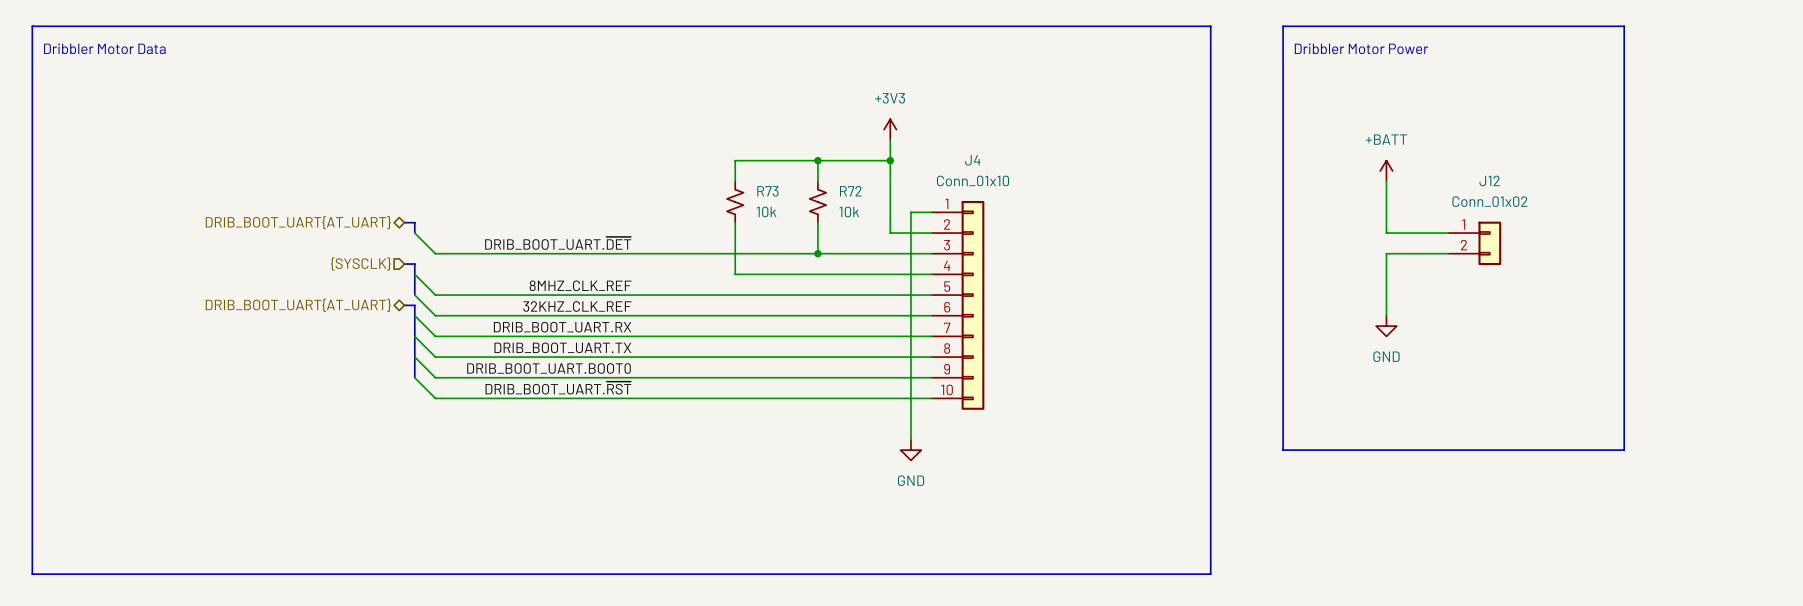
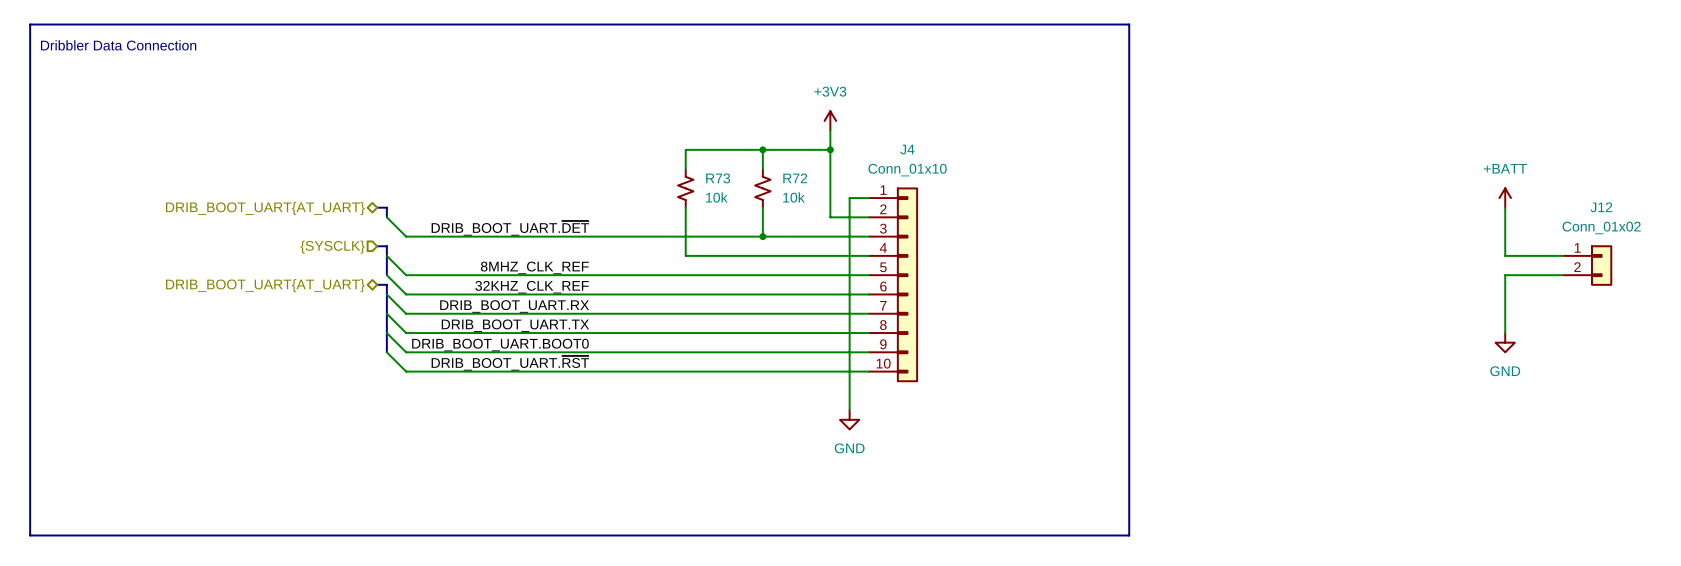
line: (1283, 26) (1624, 26) (1624, 450) (1283, 450) (1283, 26) -> none
text: Dribbler Motor Data (104, 48) -> Dribbler Data Connection (118, 45)
text: Dribbler Motor Power (1361, 48) -> none
power symbol: +BATT (1386, 171) -> none
wire: (1386, 181) (1386, 233) (1448, 233) -> none
power symbol: none -> +BATT (1505, 198)
wire: none -> (1505, 207) (1505, 255) (1563, 255)
J12 position: (1474, 243) -> (1587, 265)
wire: (1448, 253) (1386, 253) (1386, 315) -> none
wire: none -> (1563, 275) (1505, 275) (1505, 333)
power symbol: GND (1386, 326) -> none
power symbol: none -> GND (1505, 342)

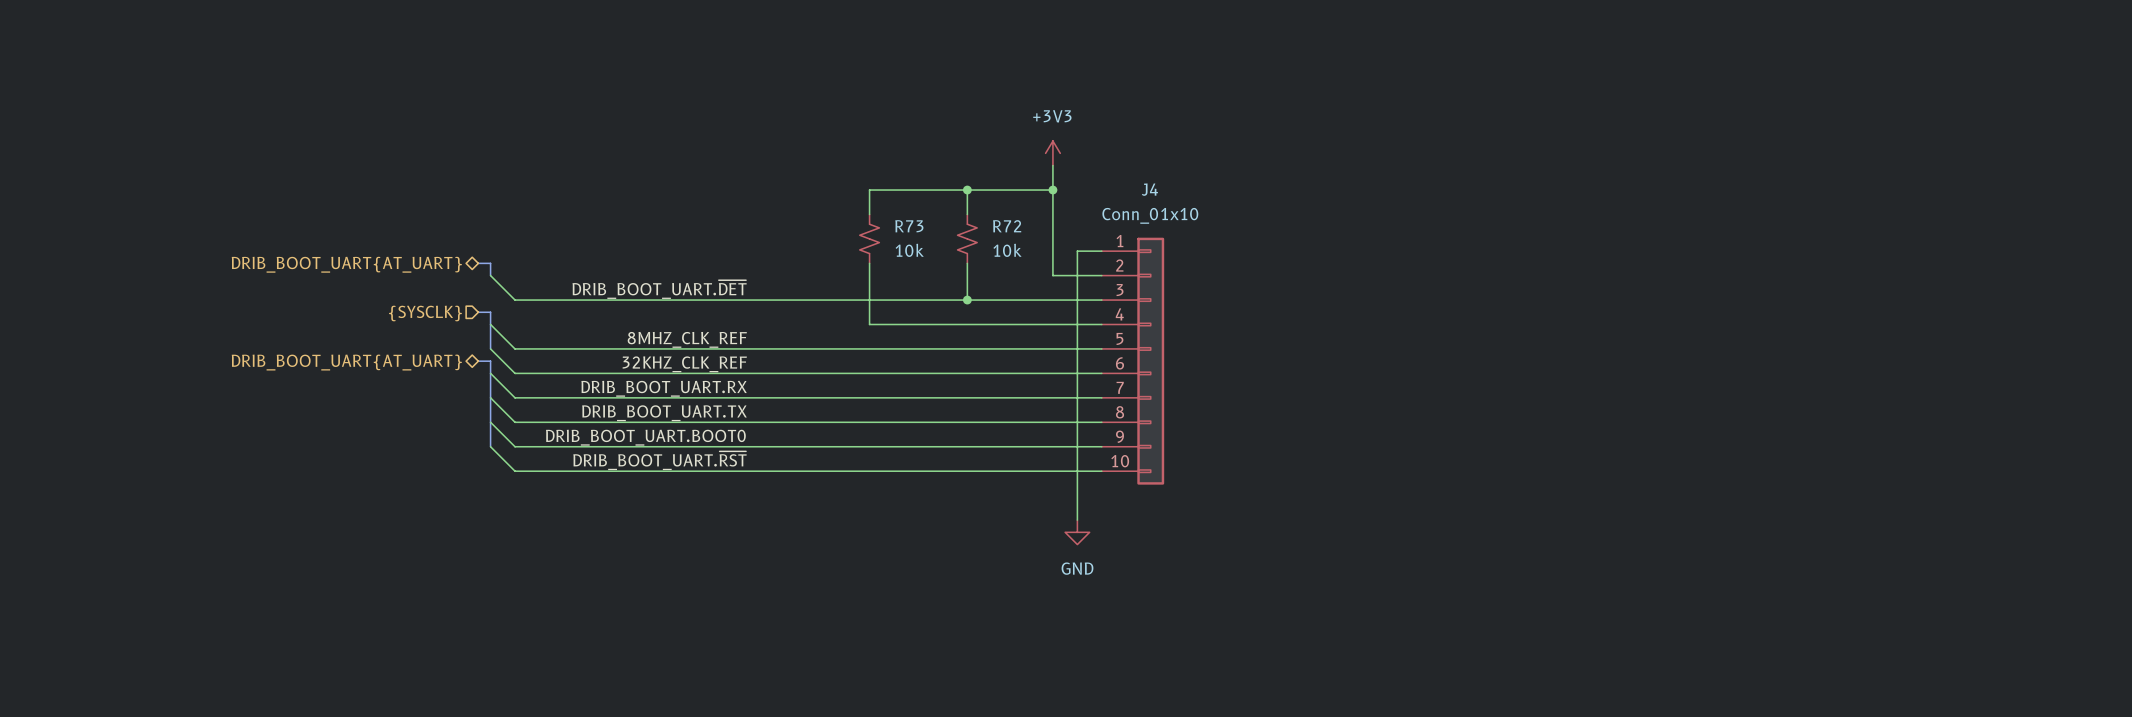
line: (30, 24) (1129, 24) (1129, 535) (30, 535) (30, 24) -> none
text: Dribbler Data Connection (118, 45) -> none
power symbol: +BATT (1505, 198) -> none
wire: (1505, 207) (1505, 255) (1563, 255) -> none
J12: Conn_01x02 (1587, 265) -> none
wire: (1563, 275) (1505, 275) (1505, 333) -> none
power symbol: GND (1505, 342) -> none

